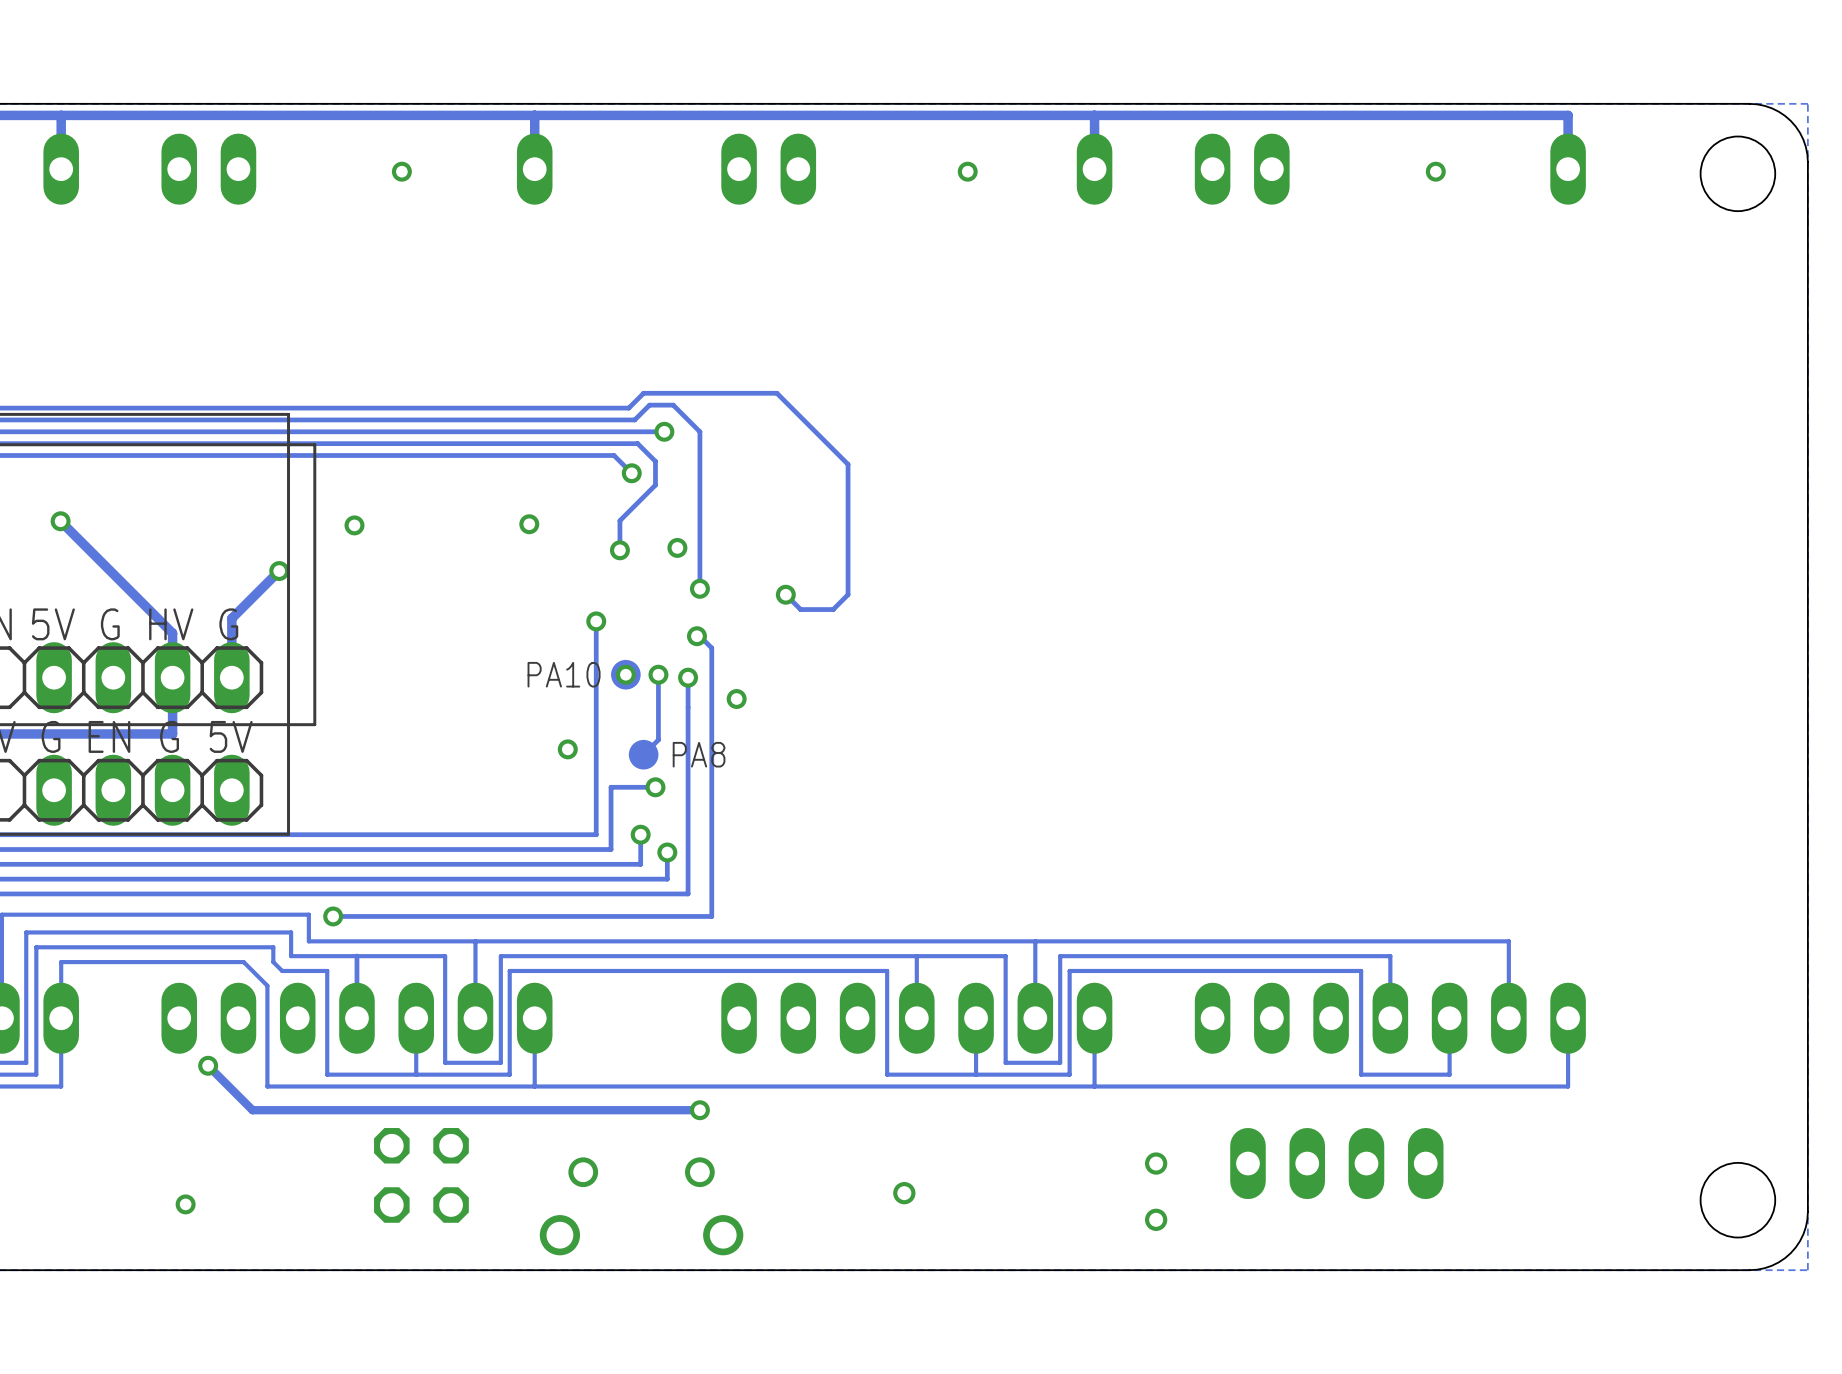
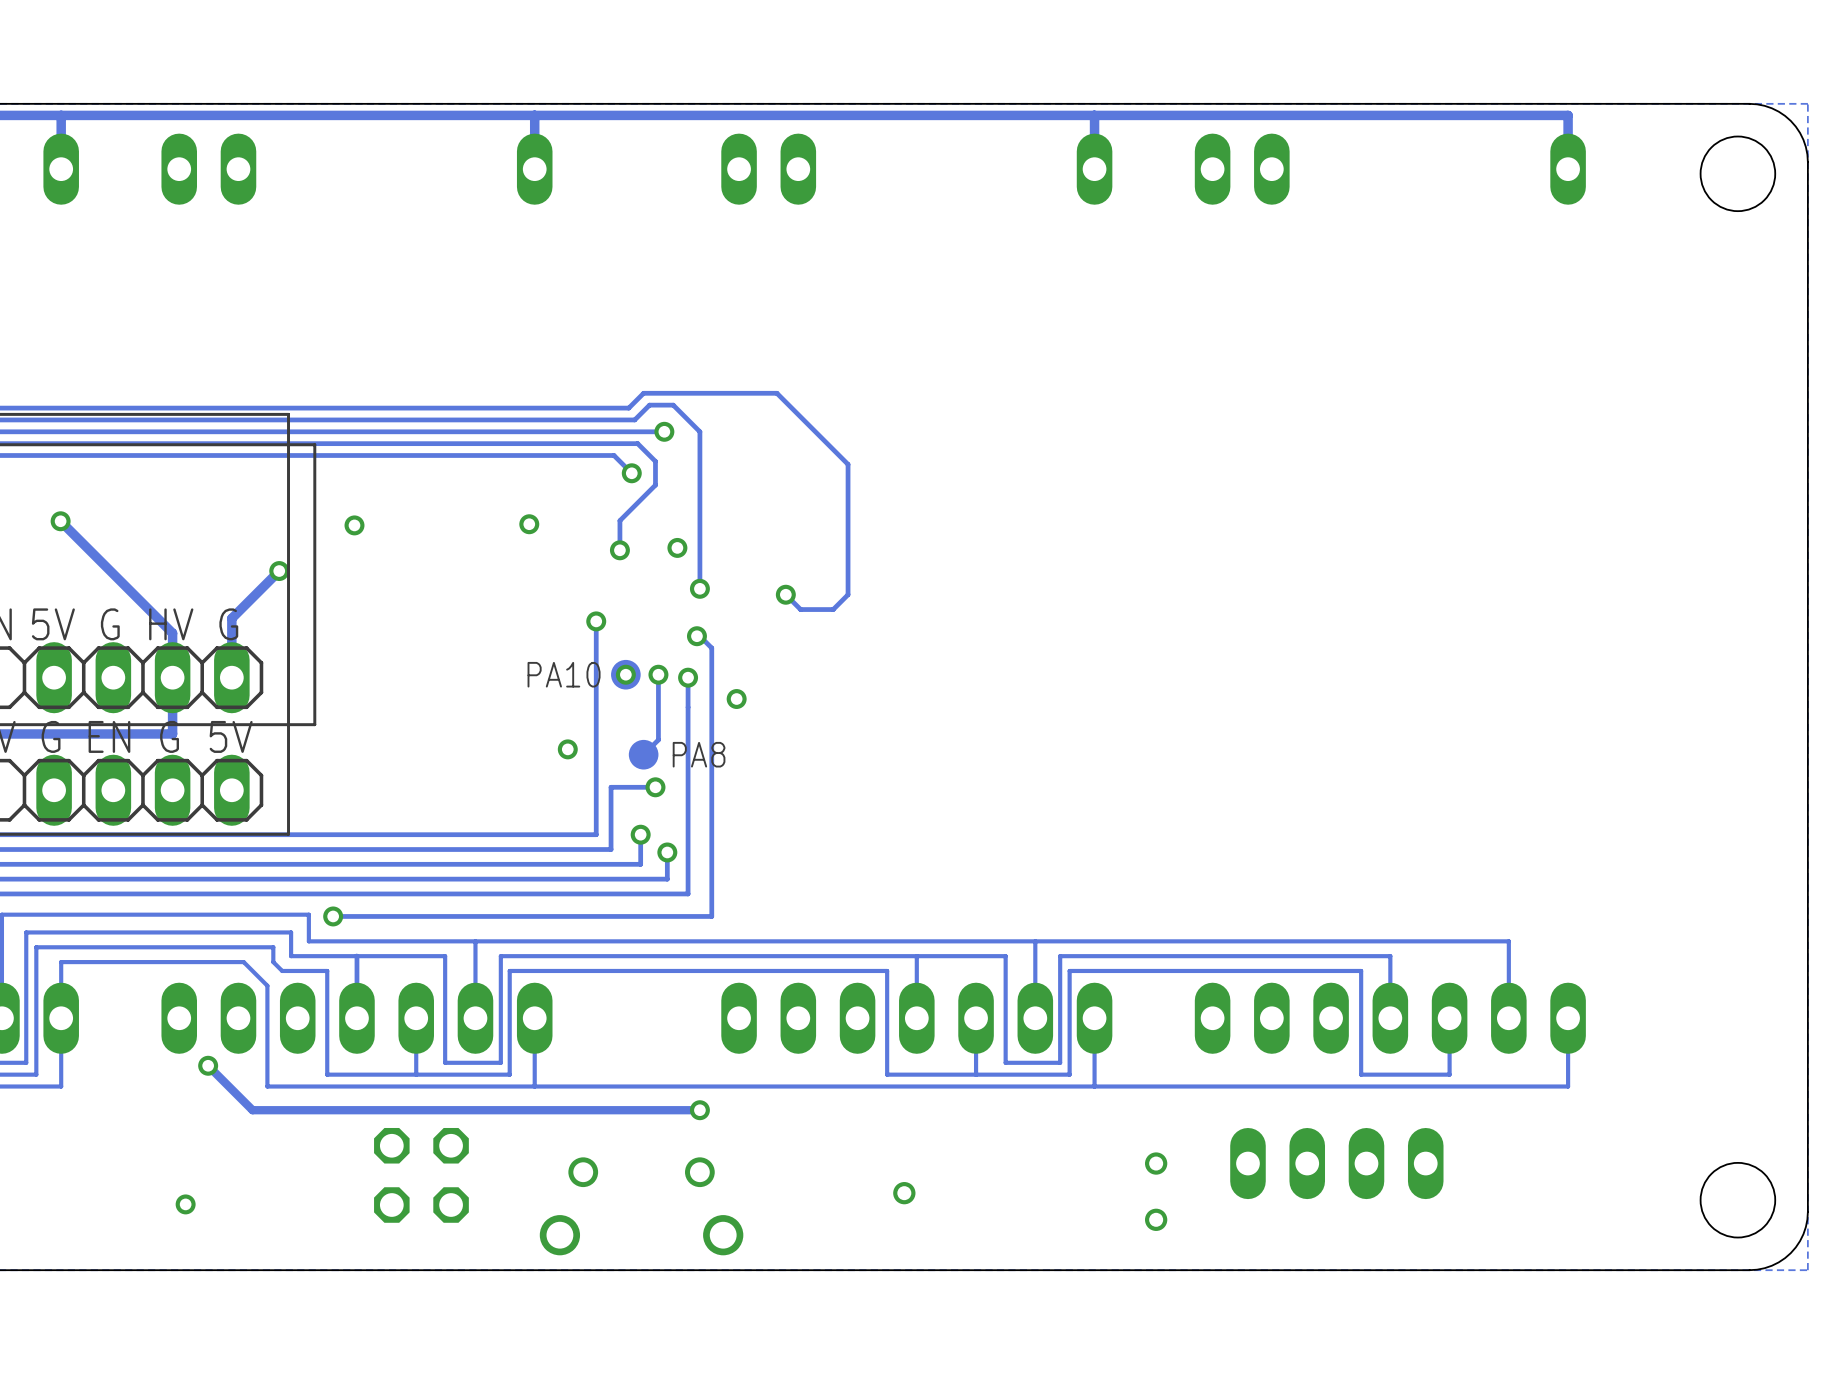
via: (401, 171) -> none
via: (967, 171) -> none
via: (1435, 171) -> none

